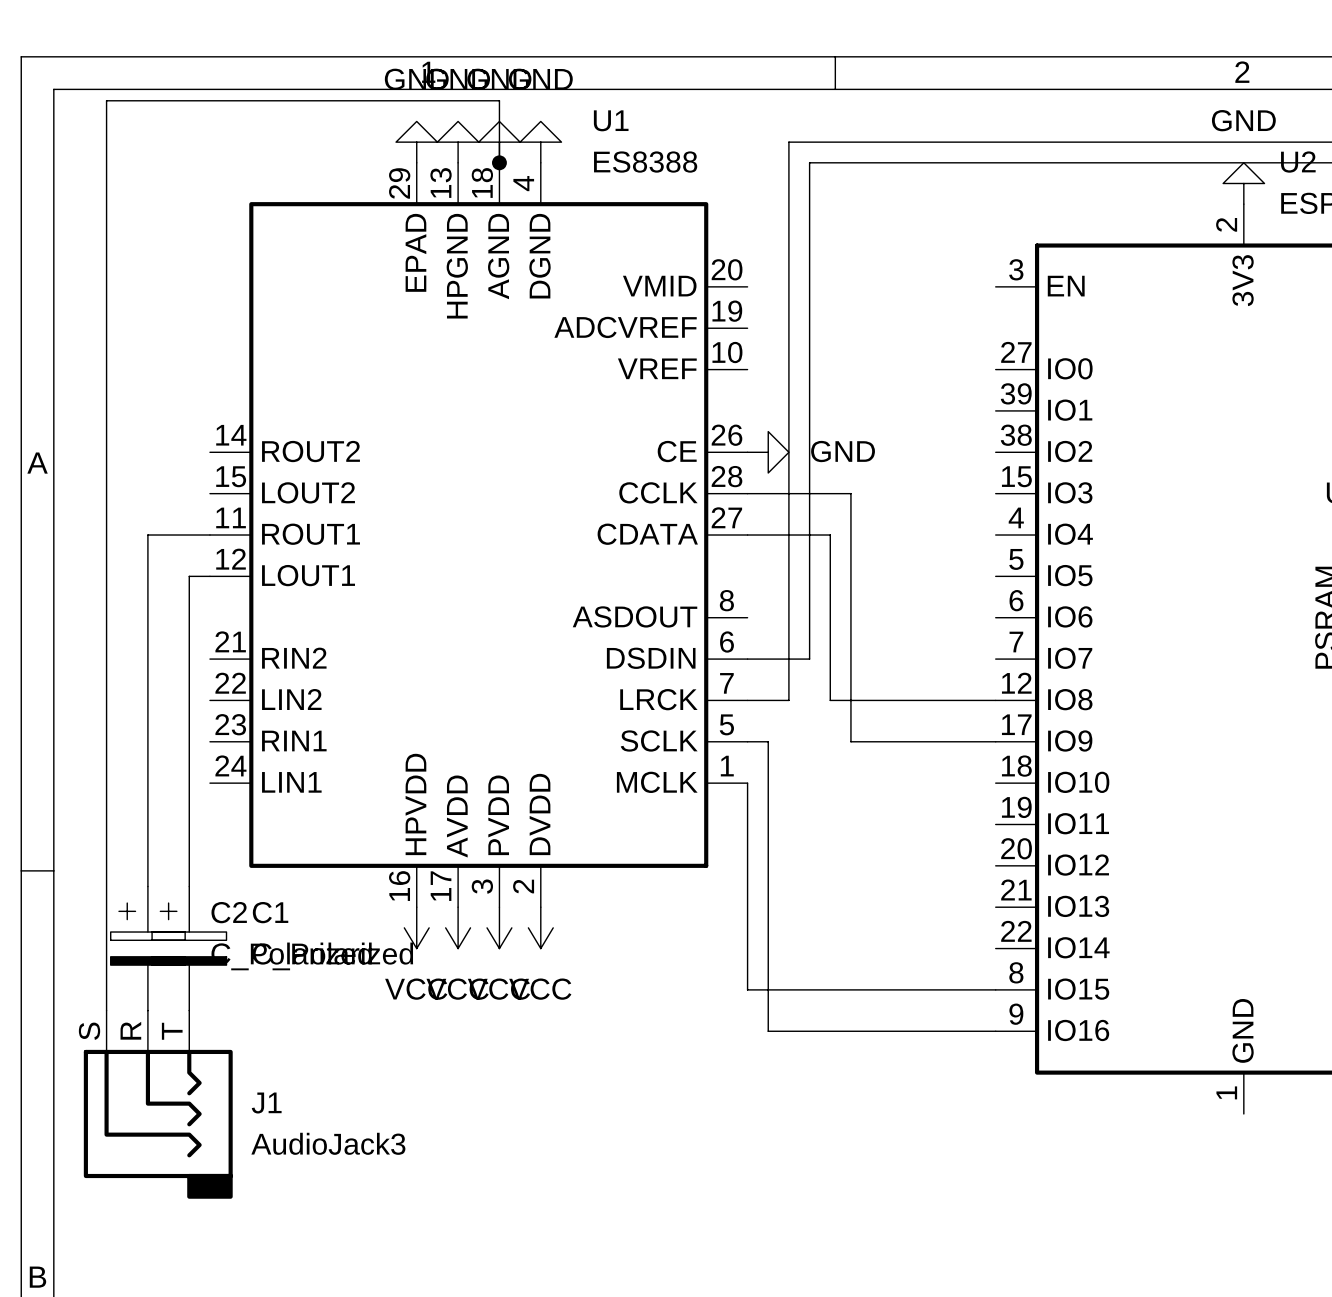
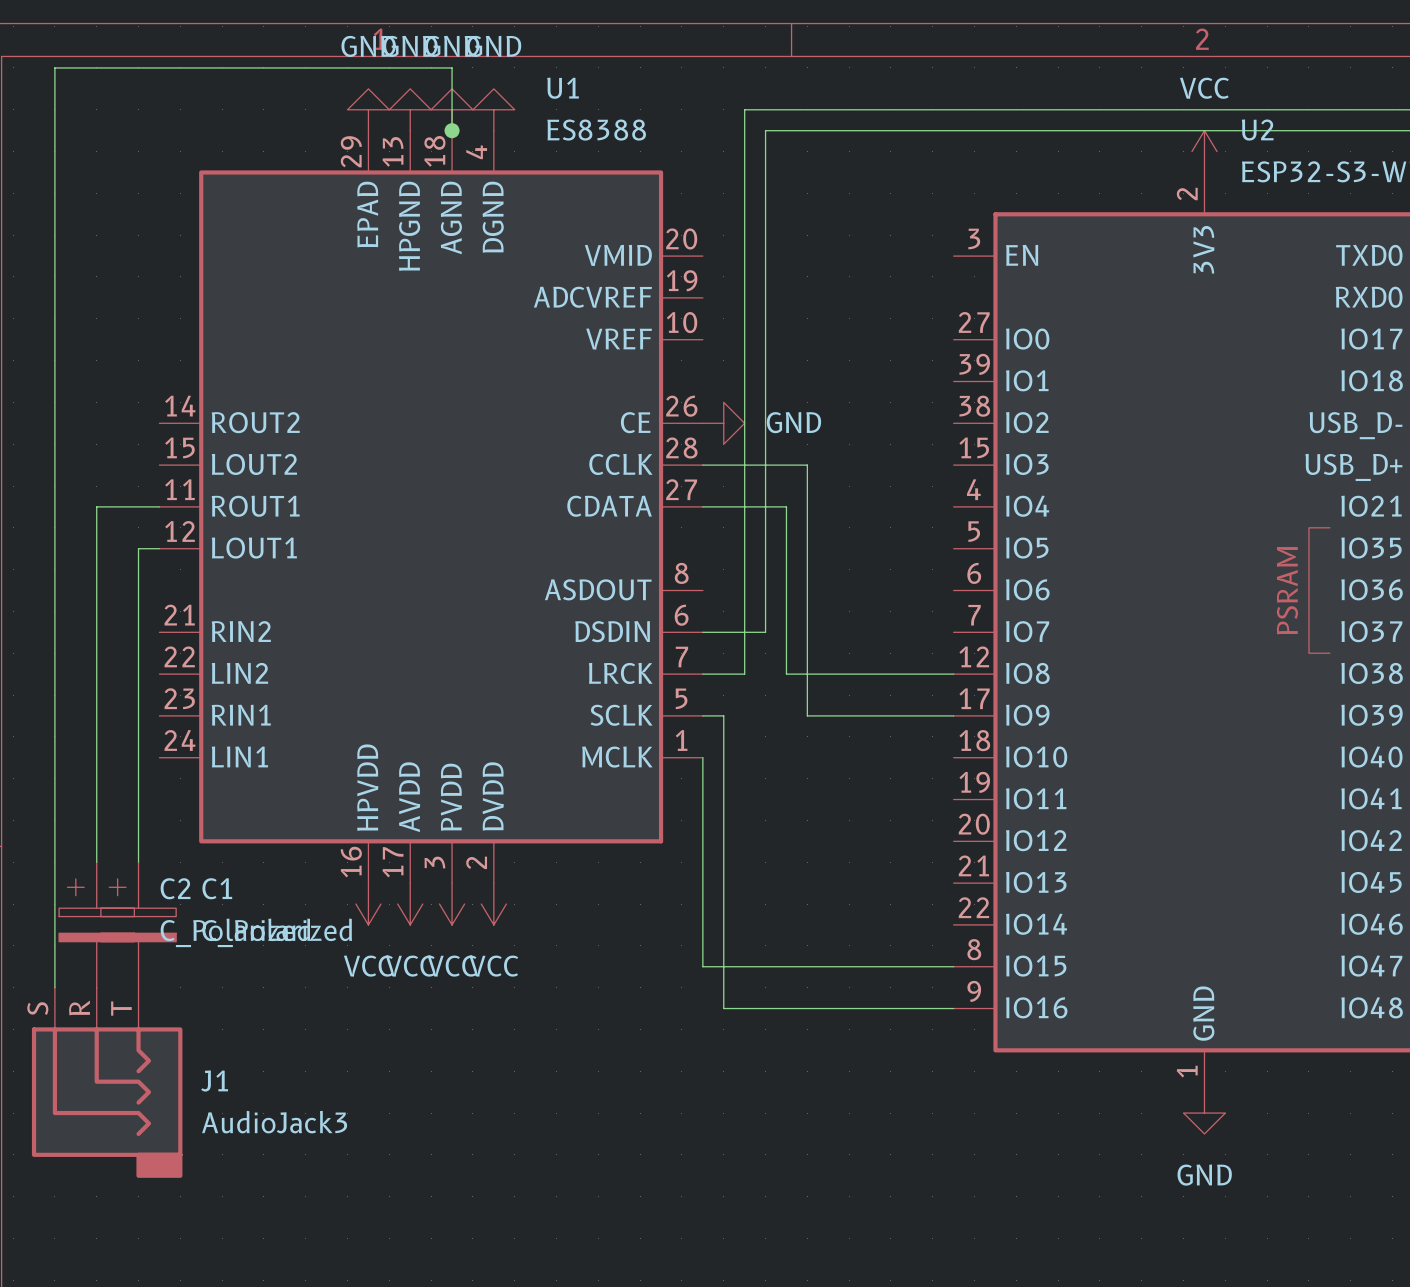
power symbol: GND (1243, 183) -> VCC (1204, 151)
power symbol: none -> GND (1204, 1113)

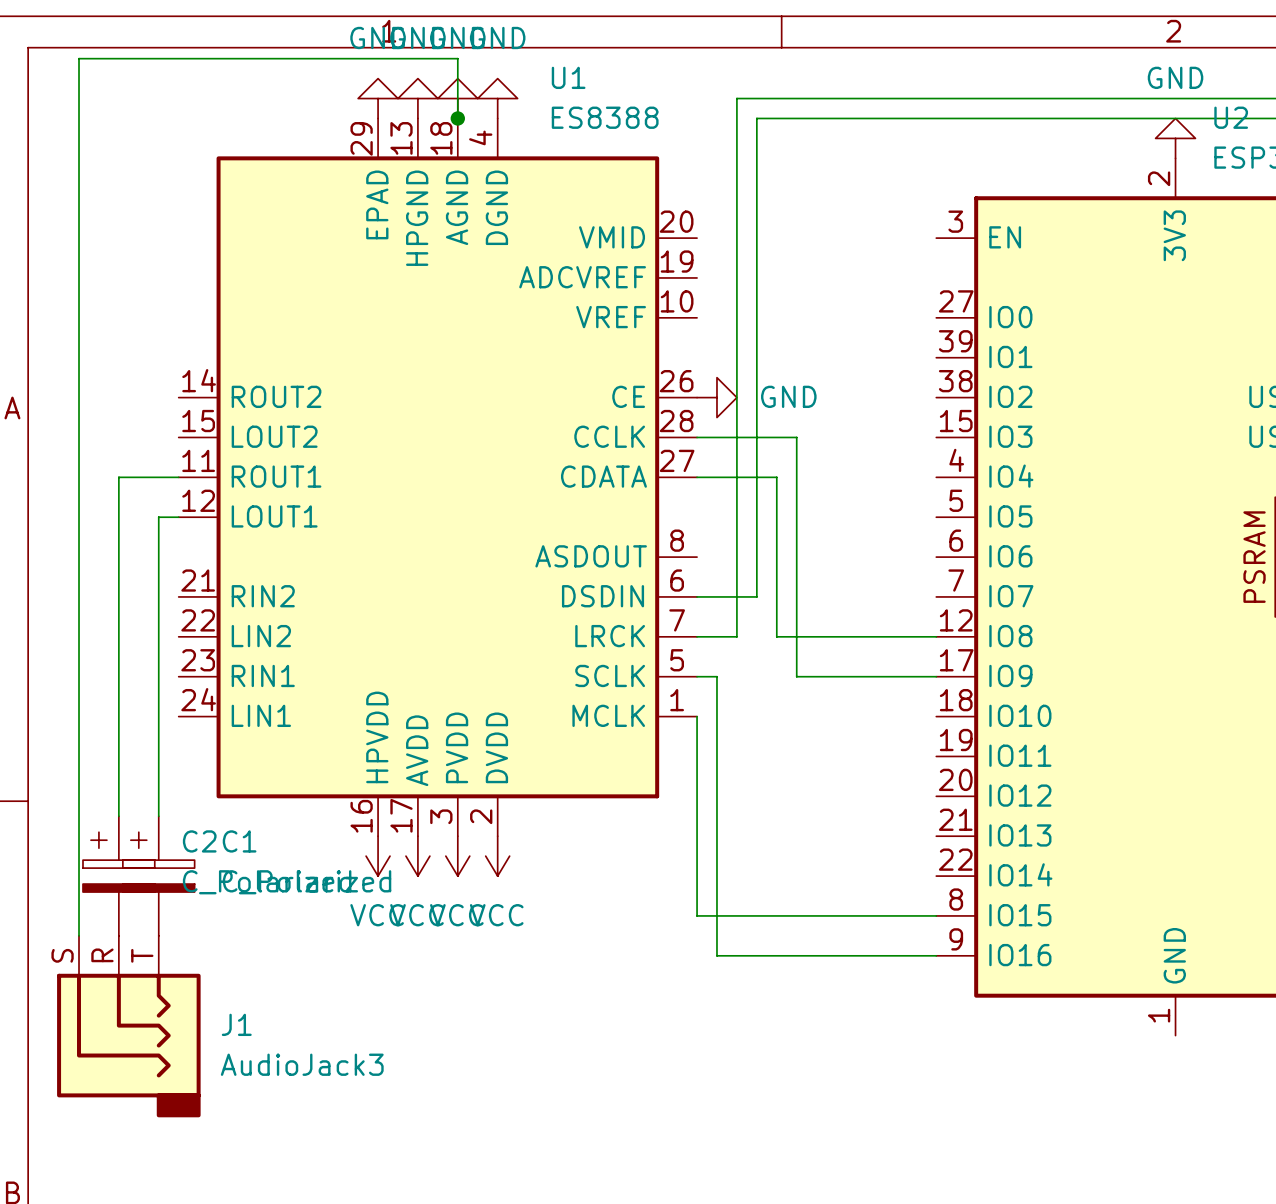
power symbol: VCC (1204, 151) -> GND (1175, 138)
power symbol: GND (1204, 1113) -> none

